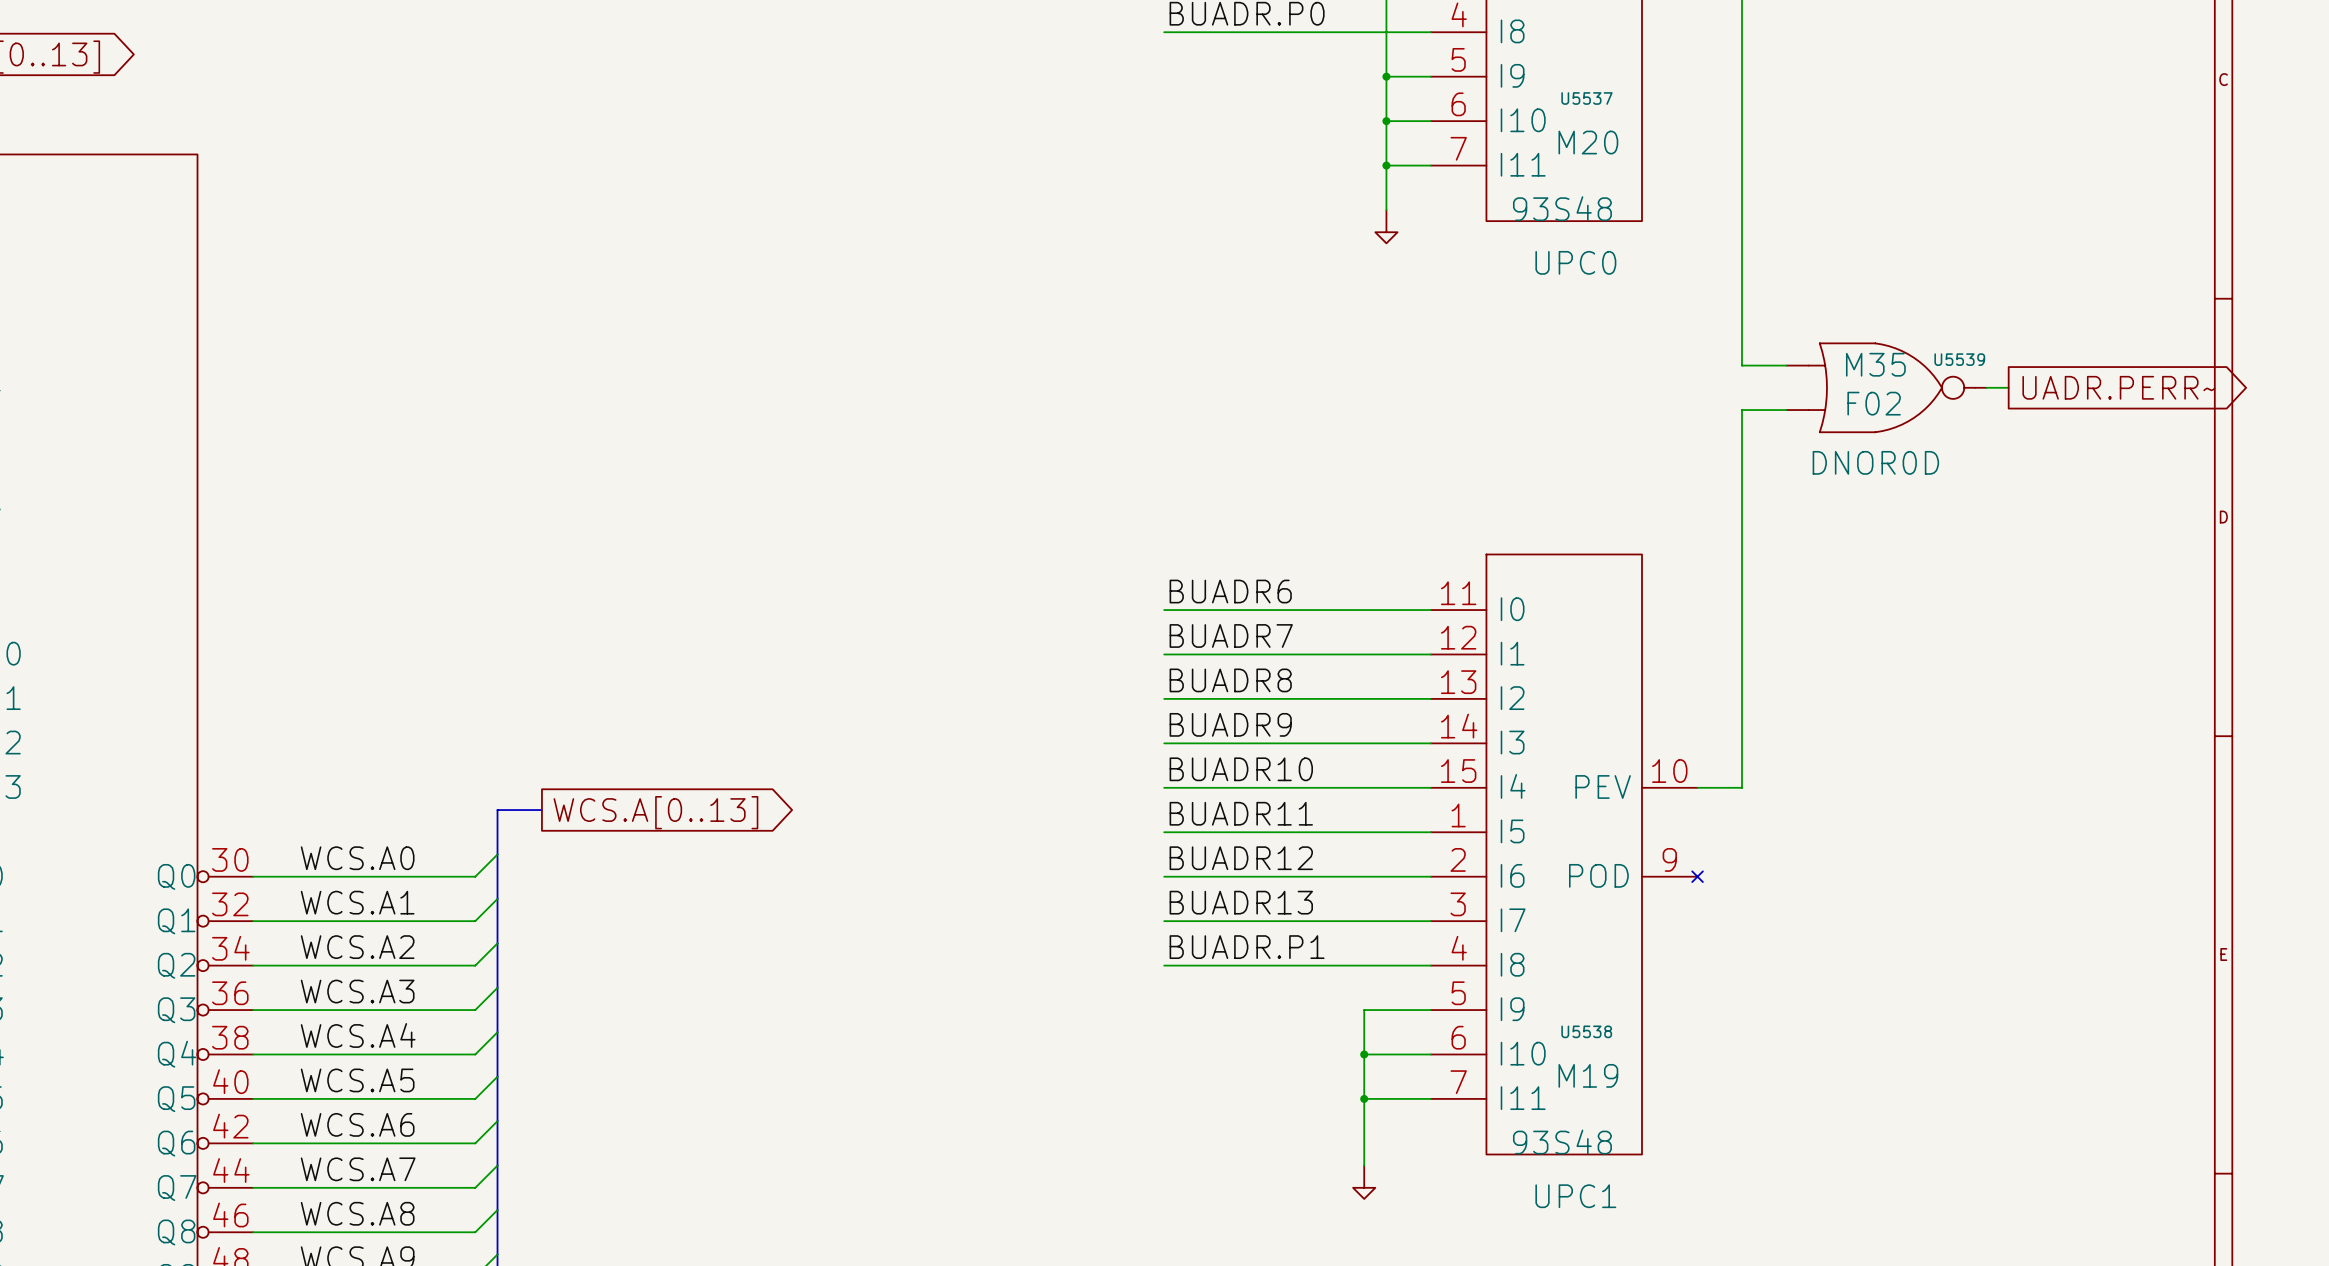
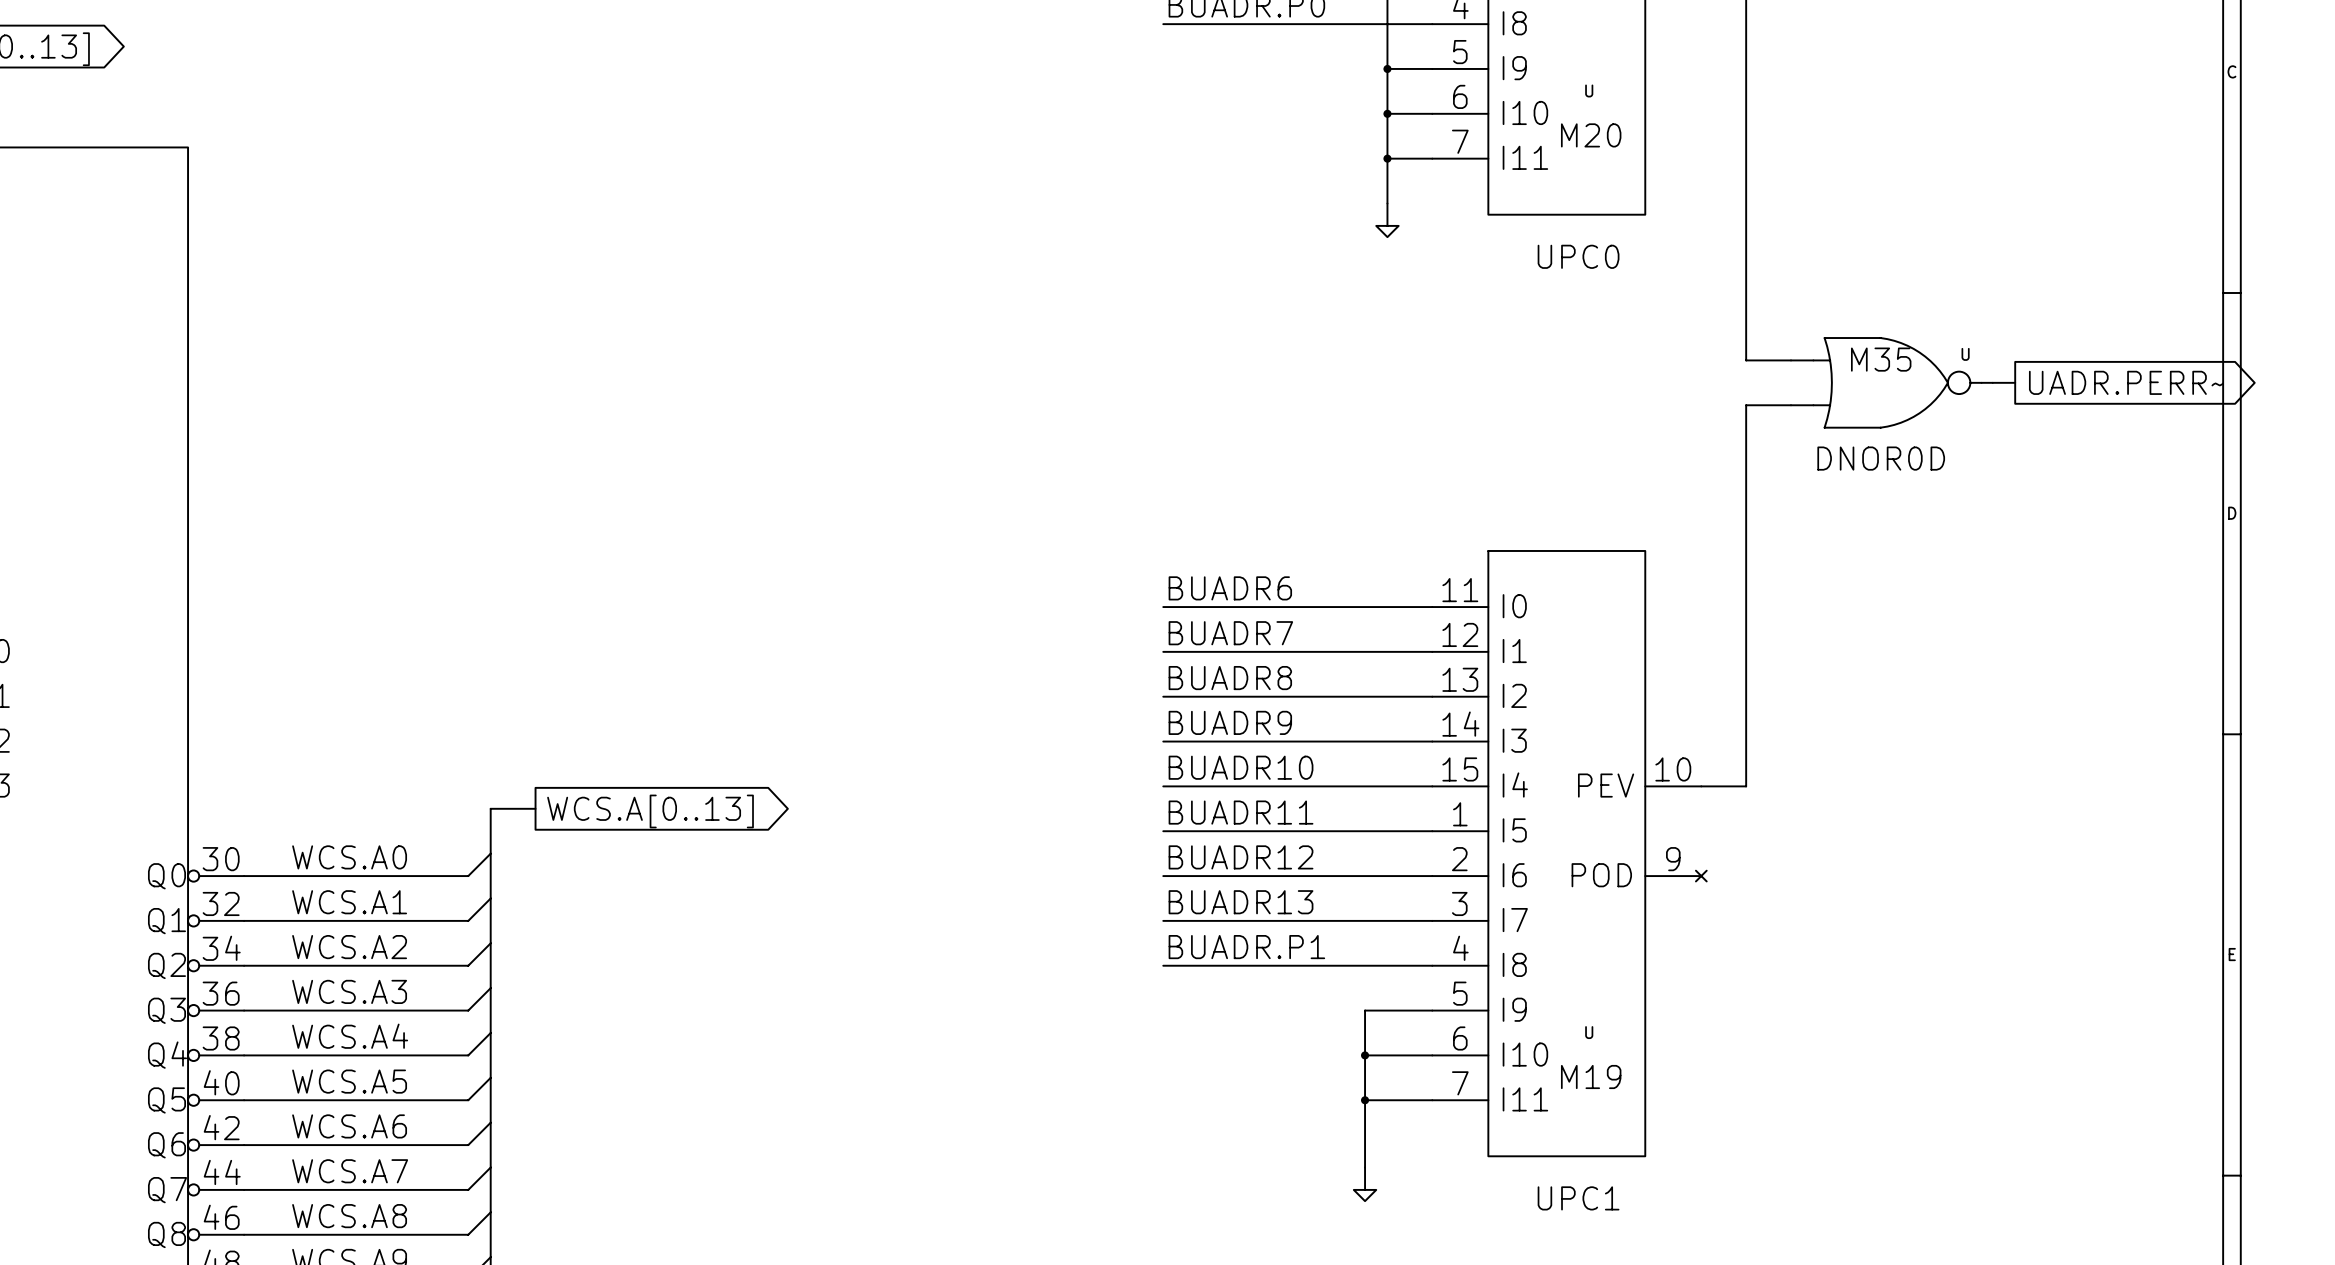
U5537 name: U5537 (1586, 98) -> U (1589, 90)
U5537 value: 93S48 (1562, 208) -> none
U5539 name: U5539 (1959, 359) -> U (1965, 354)
U5539 value: F02 (1874, 403) -> none
U5538 name: U5538 (1586, 1031) -> U (1589, 1032)
U5538 value: 93S48 (1562, 1142) -> none

